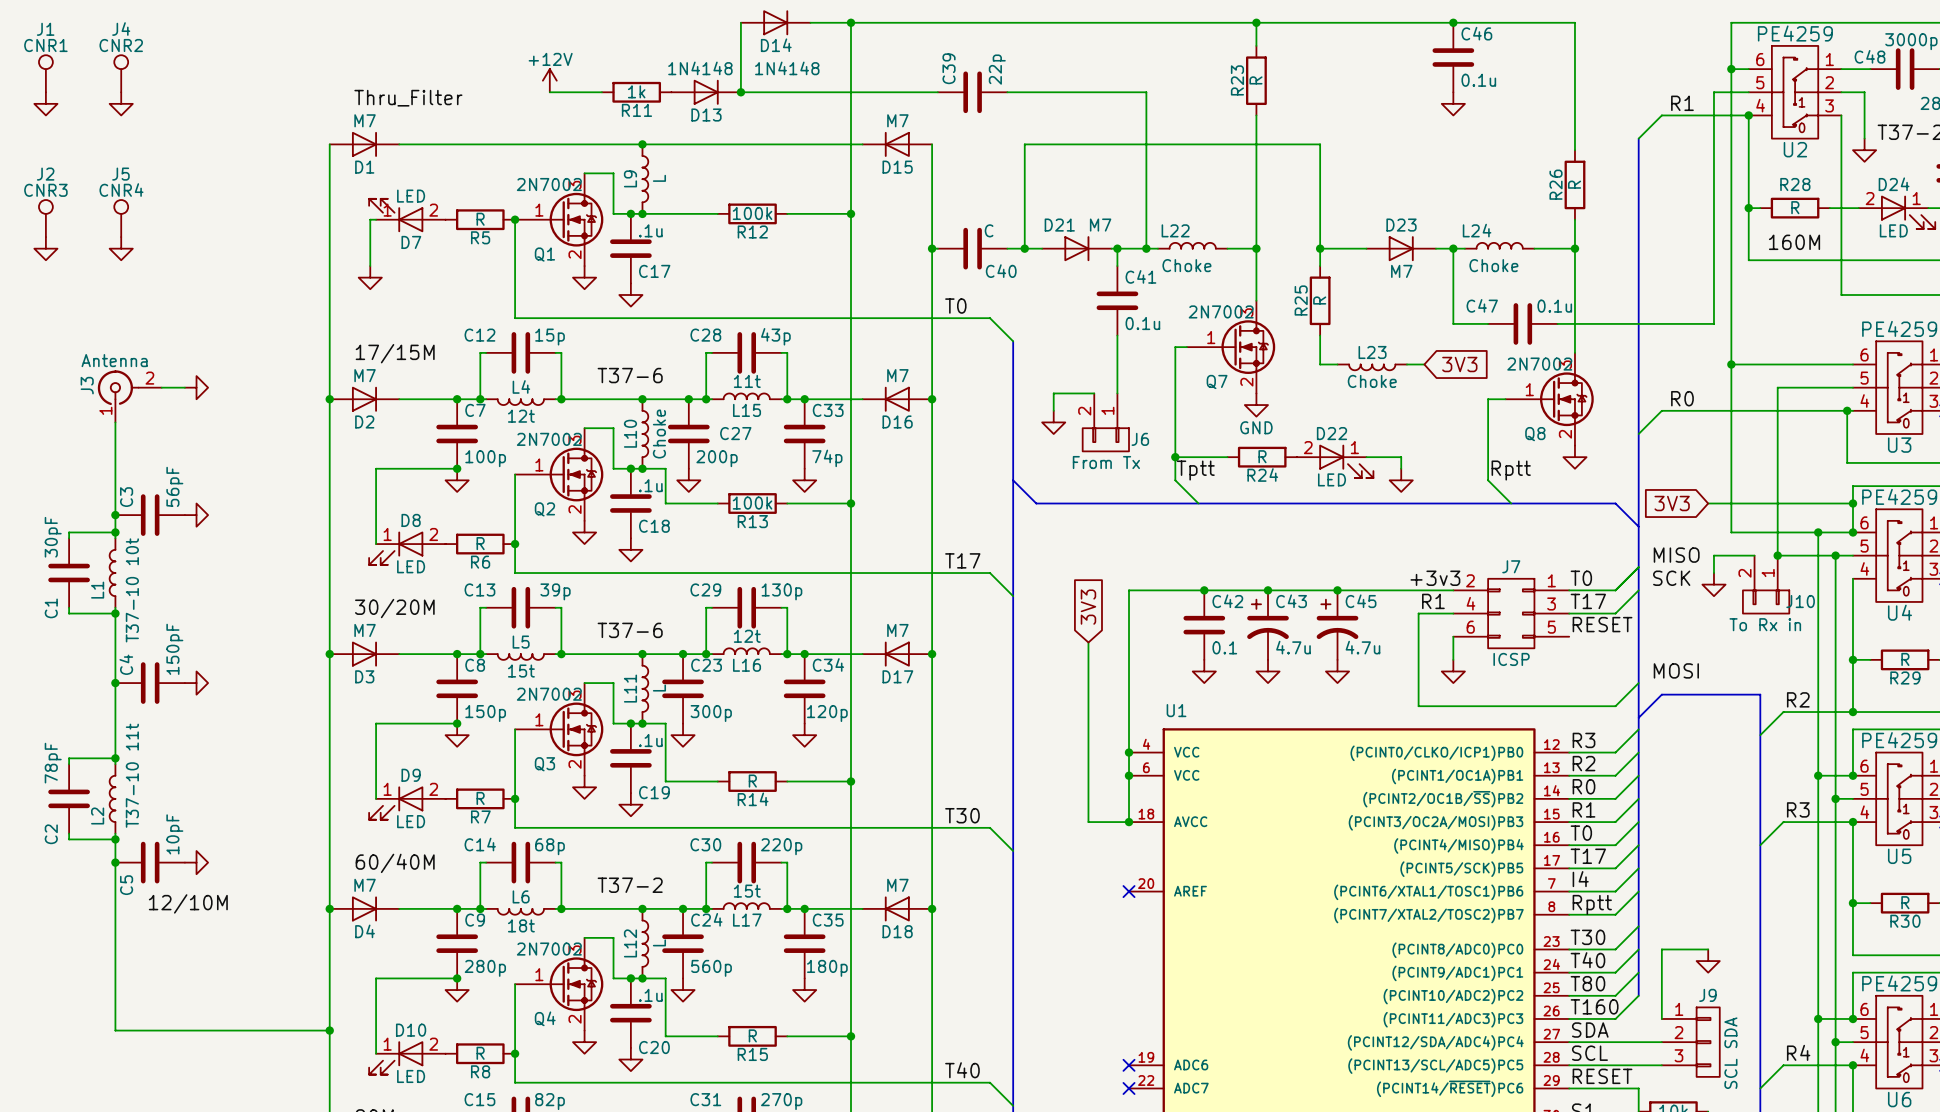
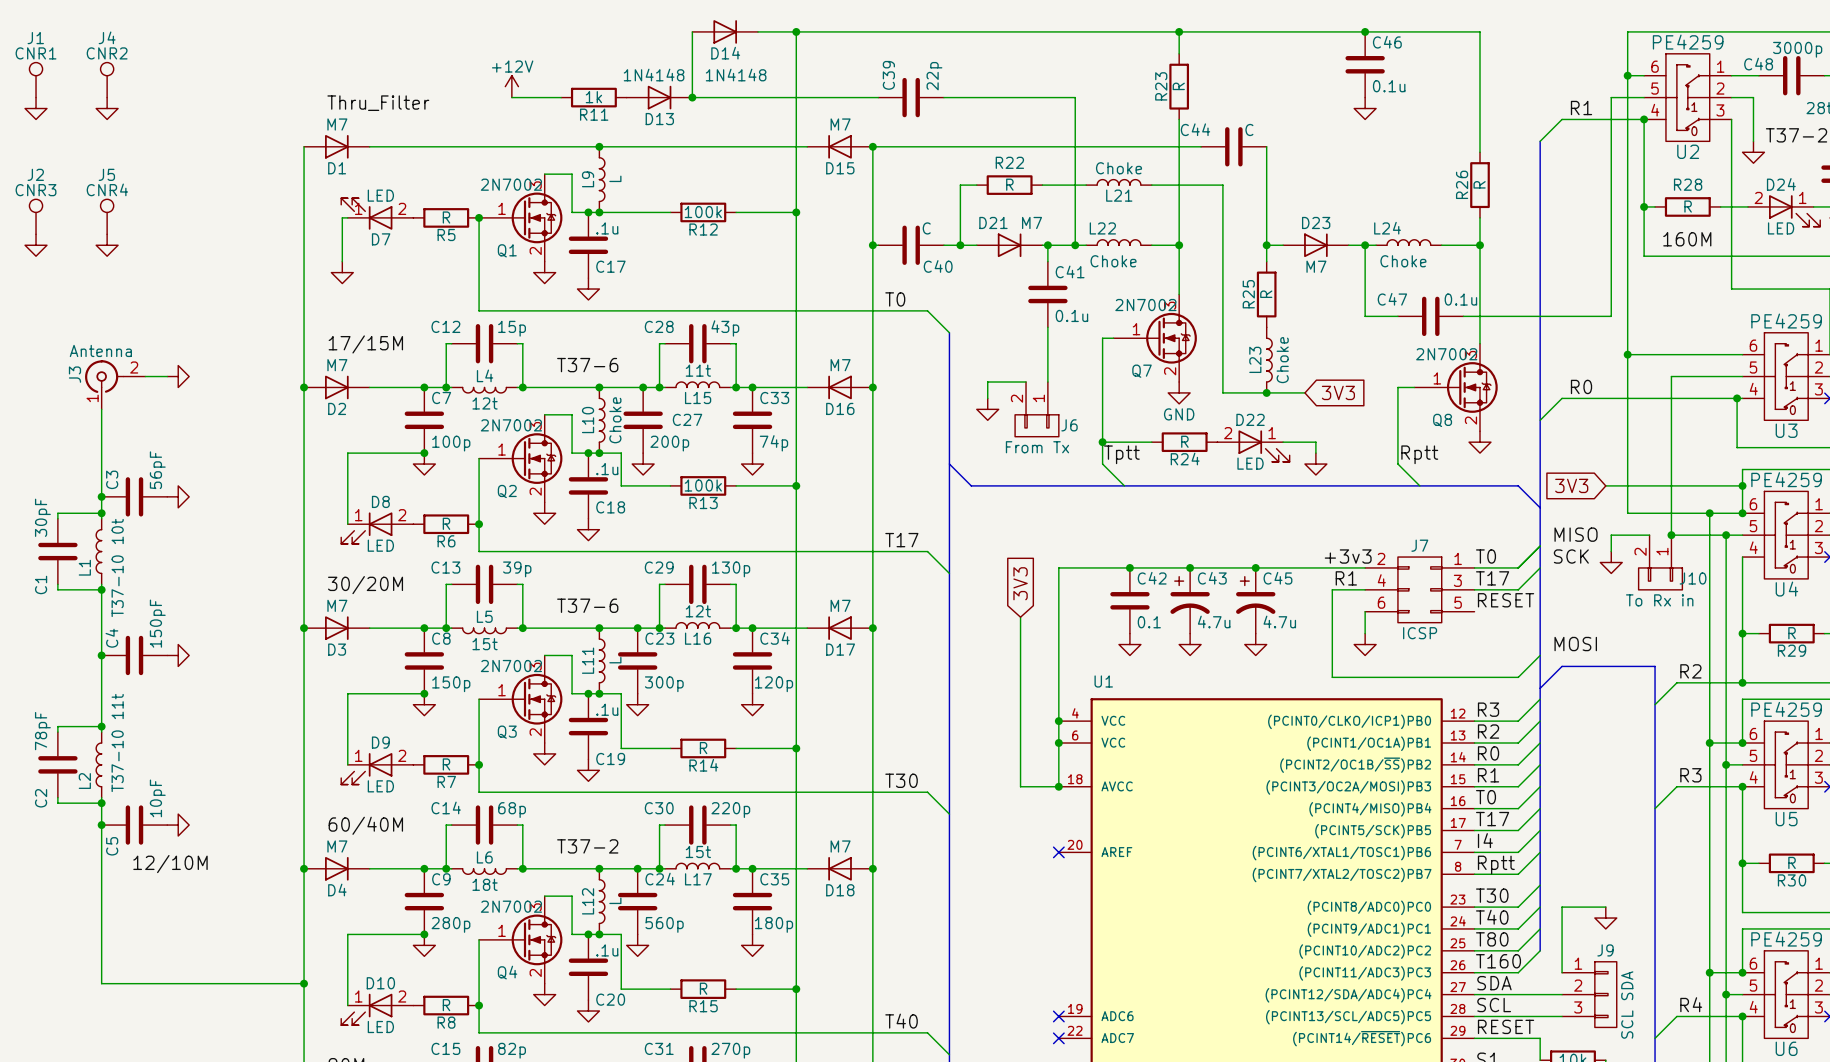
wire: none -> (872, 146) (960, 146)
junction: none -> (872, 146)
wire: (1024, 144) (1024, 184) -> (976, 185) (960, 185)
wire: (1279, 144) (1320, 144) (1320, 266) -> none
C44: none -> C (1233, 146)
wire: none -> (1266, 146) (1266, 261)
L21: none -> Choke (1119, 182)
R22: none -> R (1009, 185)
wire: none -> (1042, 185) (1086, 185)
wire: none -> (1151, 185) (1222, 185) (1222, 392) (1304, 392)
wire: (1320, 248) (1349, 248) -> none
junction position: (1320, 248) -> (1266, 245)
R25 position: (1320, 300) -> (1266, 294)
wire: (1320, 335) (1320, 364) (1337, 364) -> none
wire: (1407, 364) (1424, 364) -> none
global label position: 3V3 (1459, 364) -> 3V3 (1338, 392)
L23 rotation: 0° (1372, 367) -> 90° counterclockwise (1269, 360)
junction: none -> (1266, 392)

